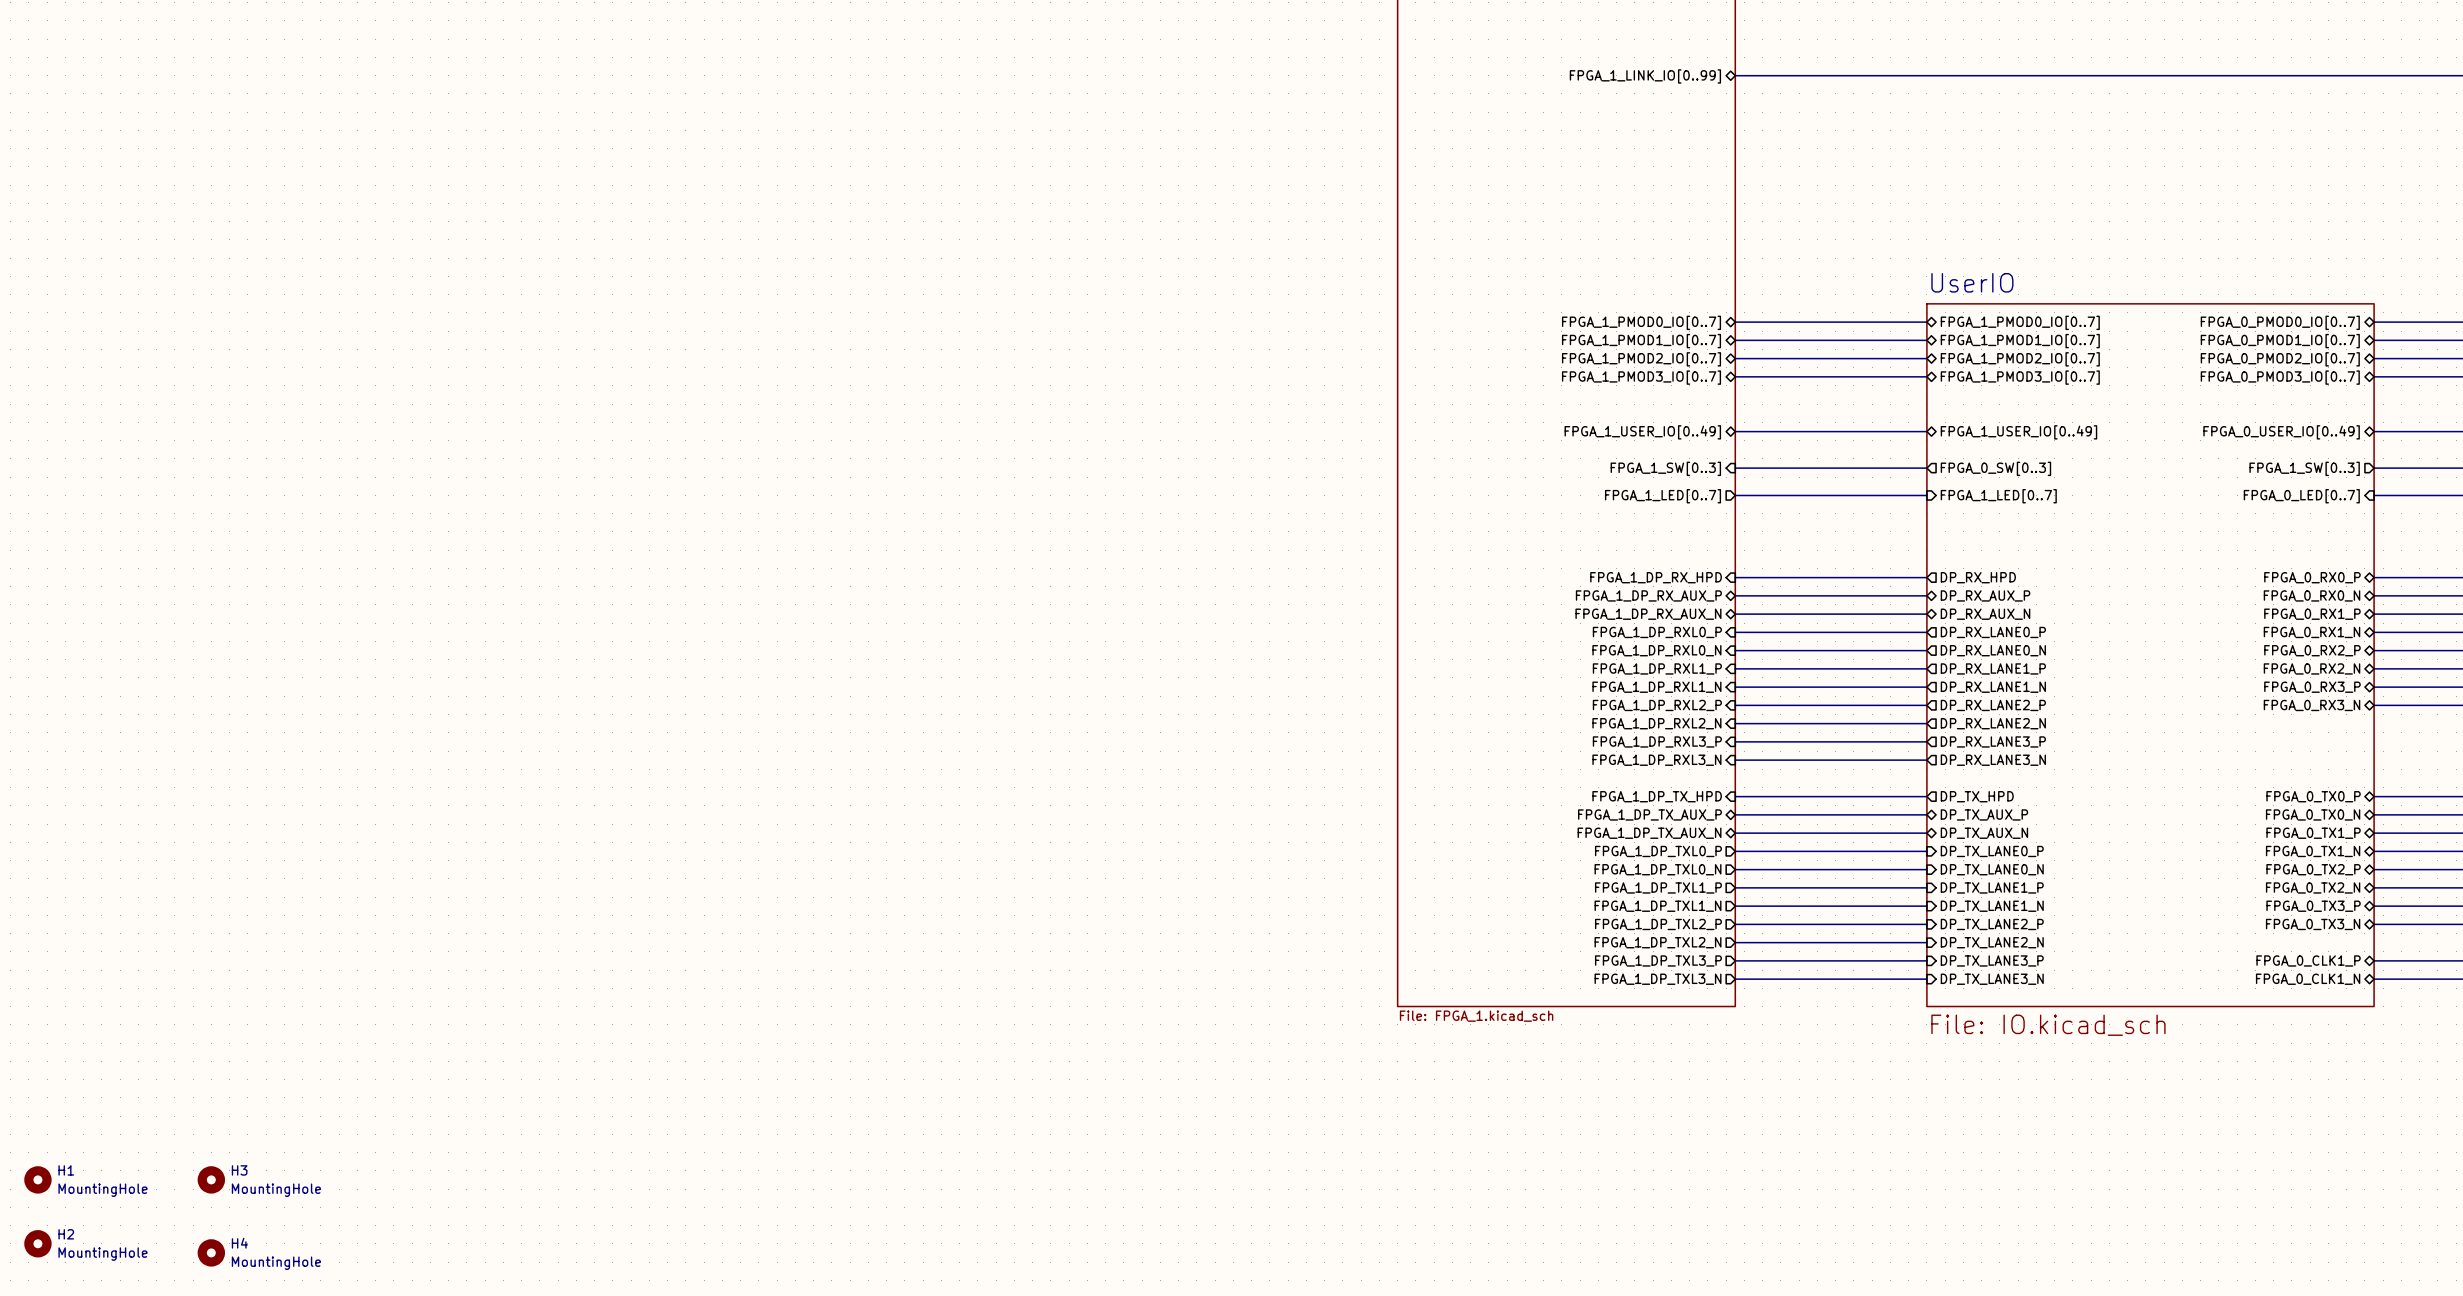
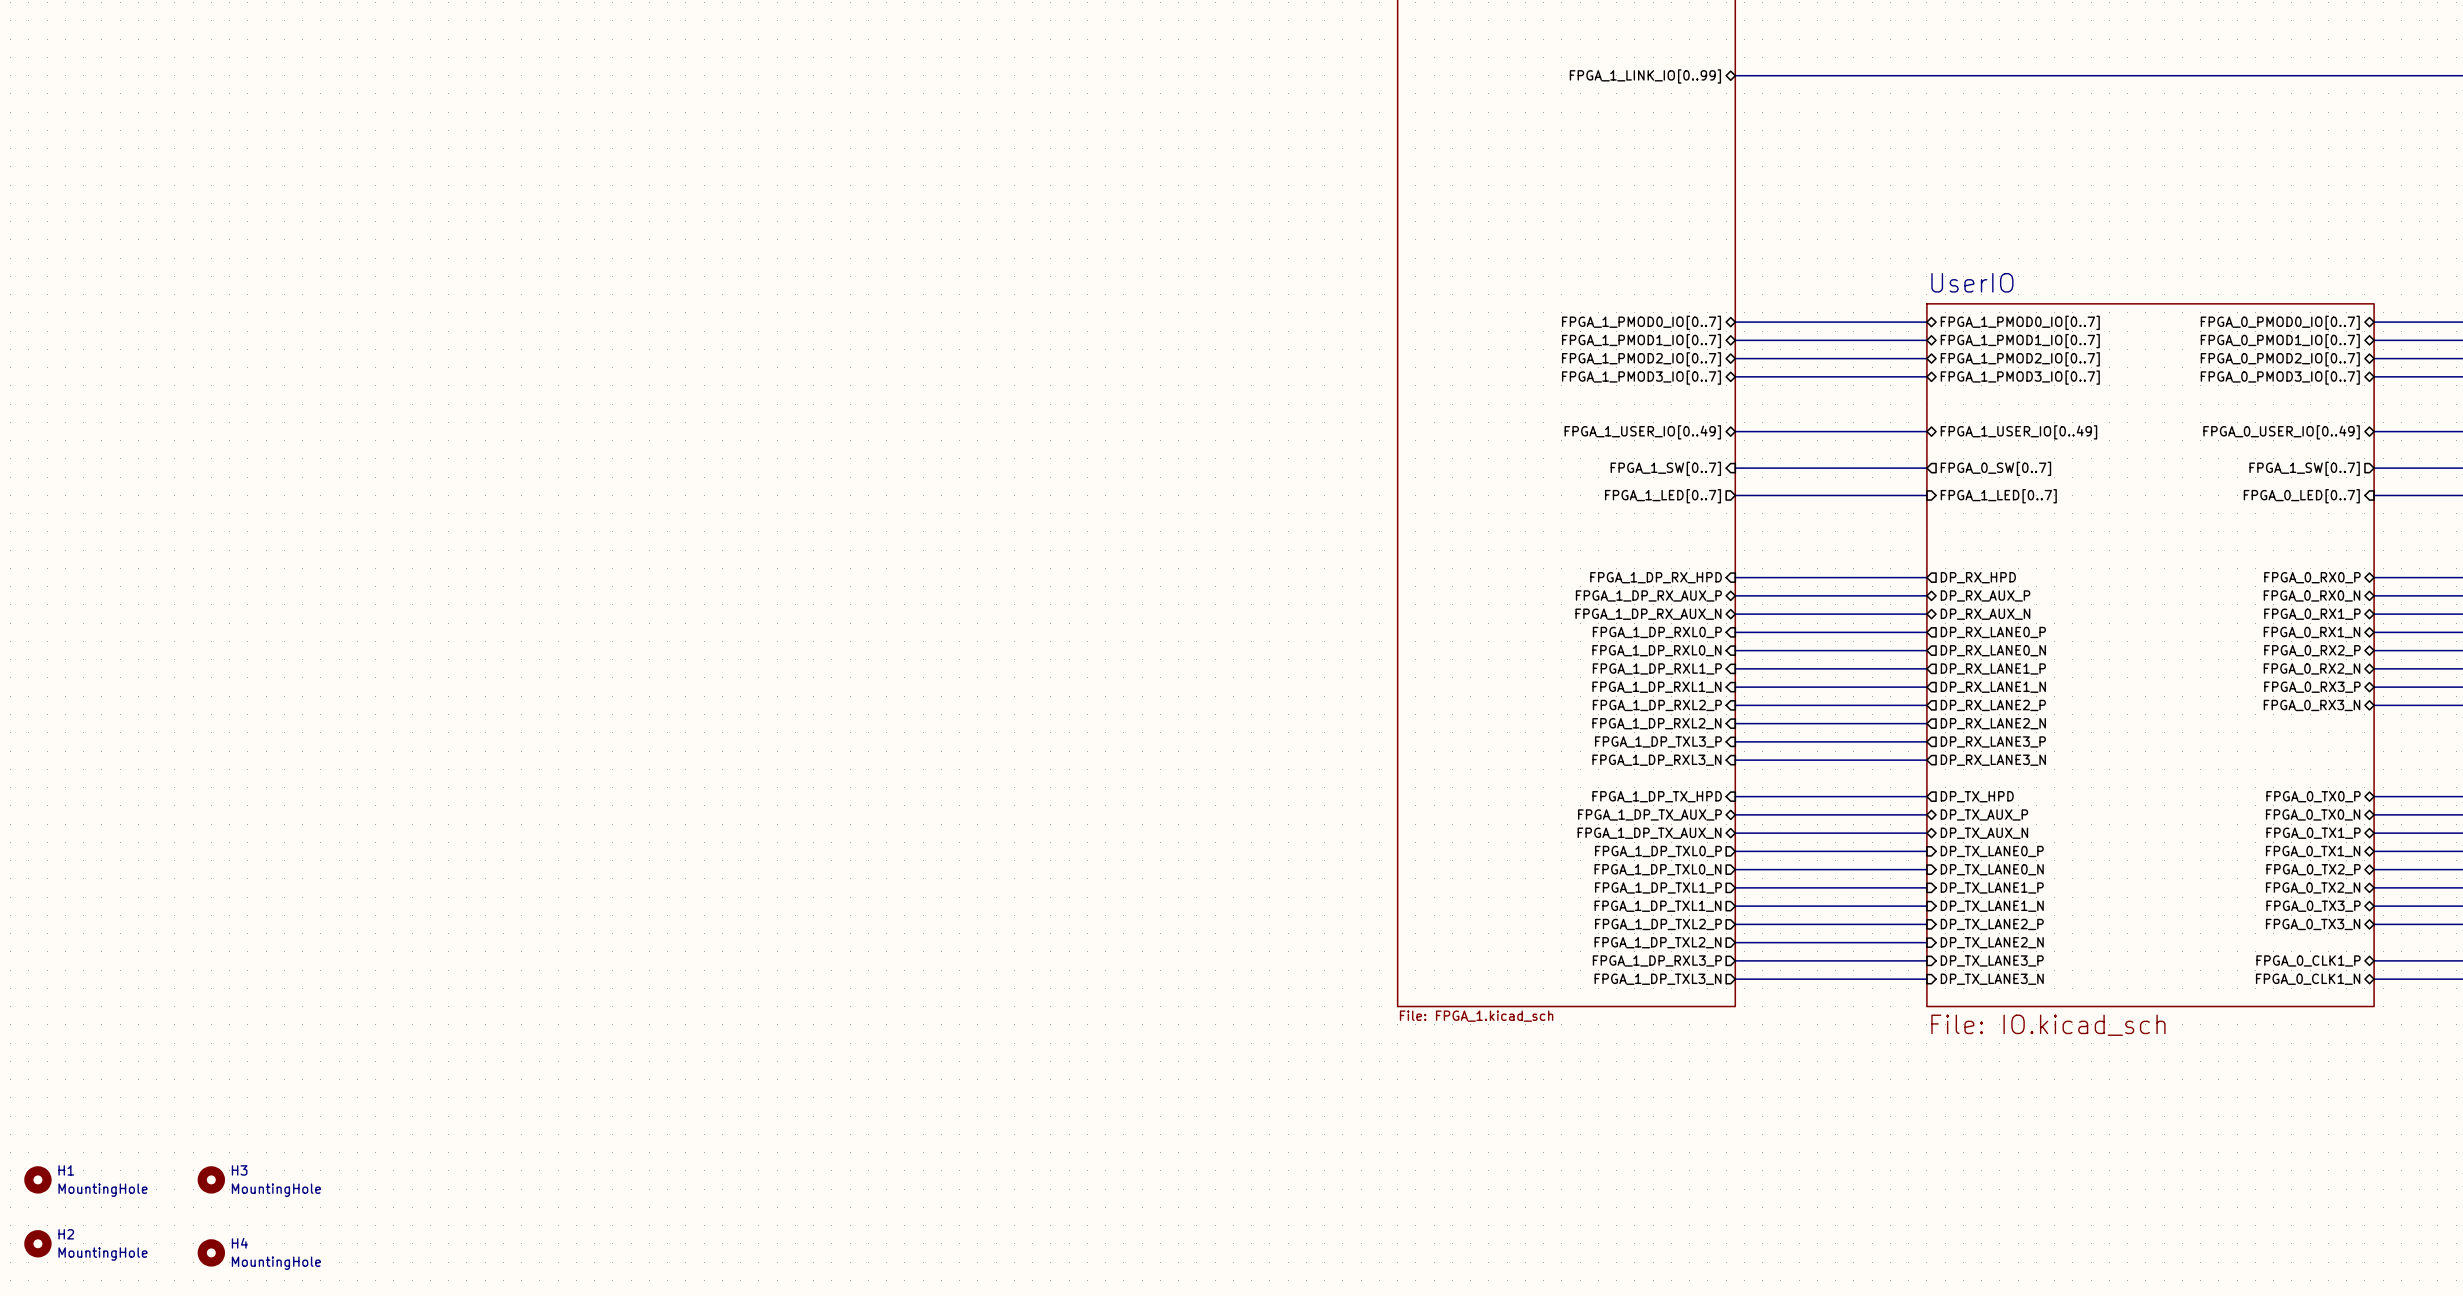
sheet pin: FPGA_1_SW[0..3] (1665, 468) -> FPGA_1_SW[0..7] (1665, 468)
sheet pin: FPGA_0_SW[0..3] (1995, 468) -> FPGA_0_SW[0..7] (1995, 468)
sheet pin: FPGA_1_SW[0..3] (2304, 468) -> FPGA_1_SW[0..7] (2304, 468)
sheet pin: FPGA_1_DP_RXL3_P (1657, 741) -> FPGA_1_DP_TXL3_P (1658, 741)
sheet pin: FPGA_1_DP_TXL3_P (1658, 960) -> FPGA_1_DP_RXL3_P (1657, 960)

